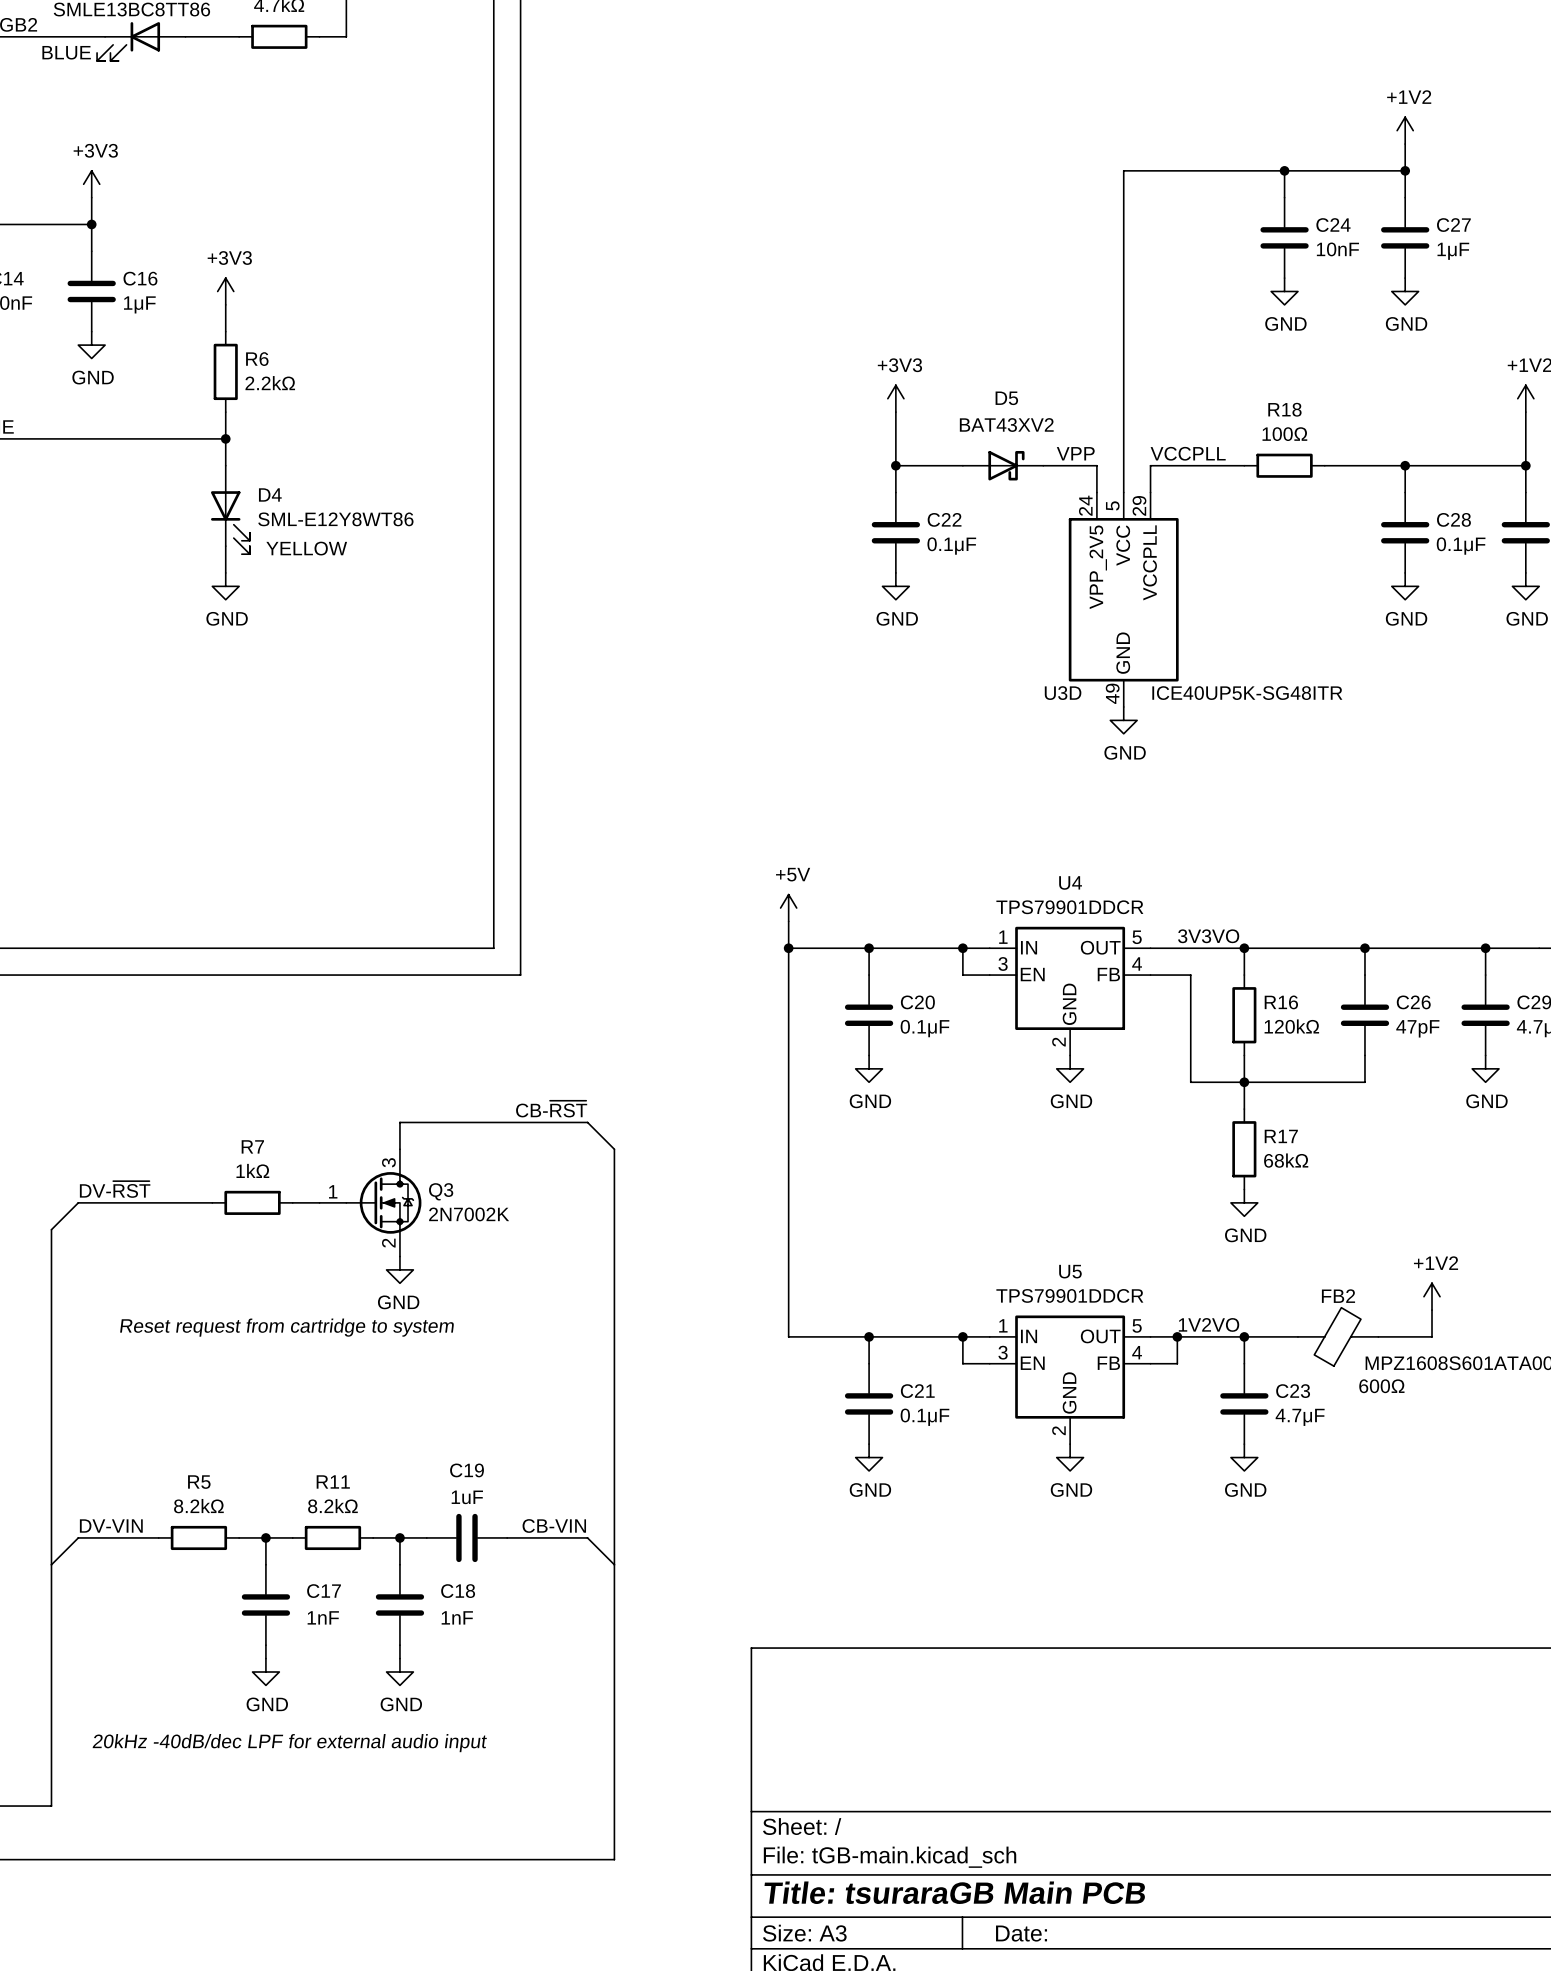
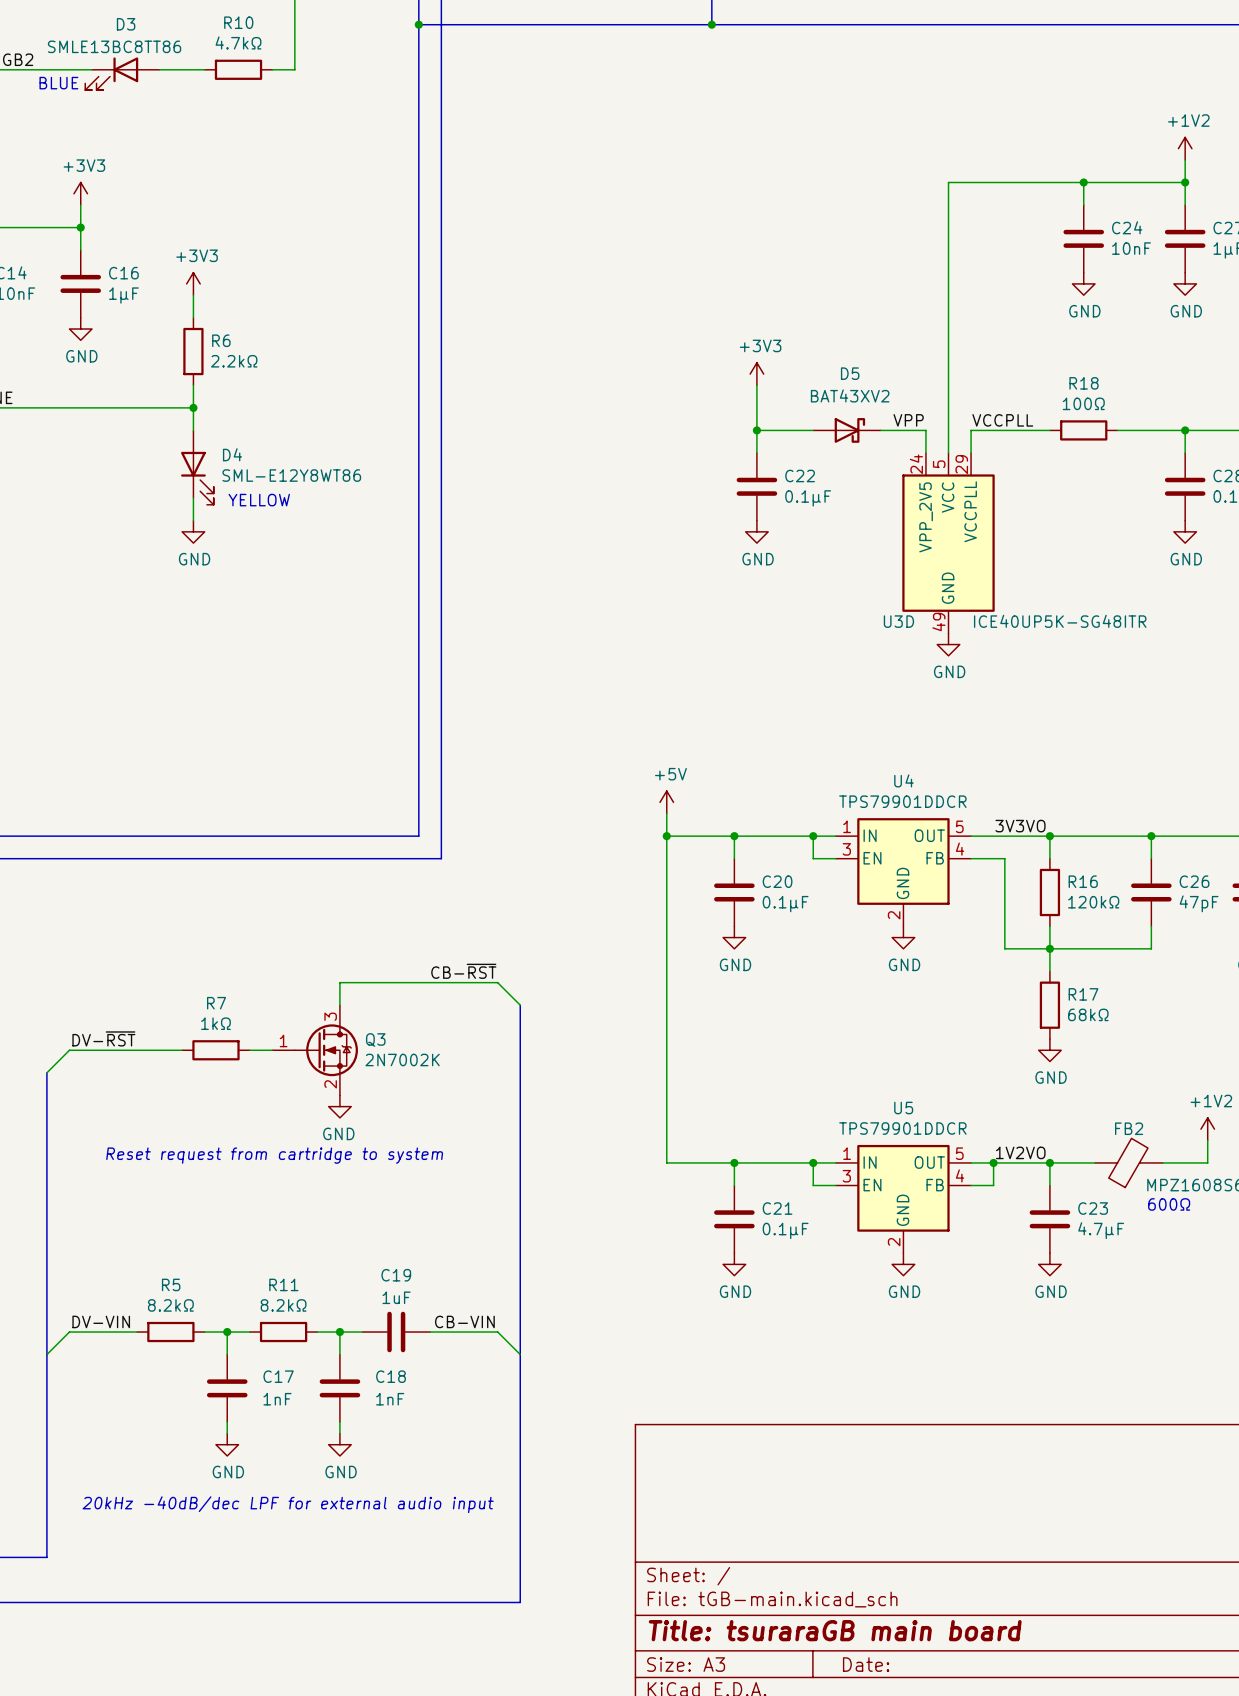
title block: Title: tsuraraGB Main PCB (954, 1892) -> Title: tsuraraGB main board (835, 1630)

